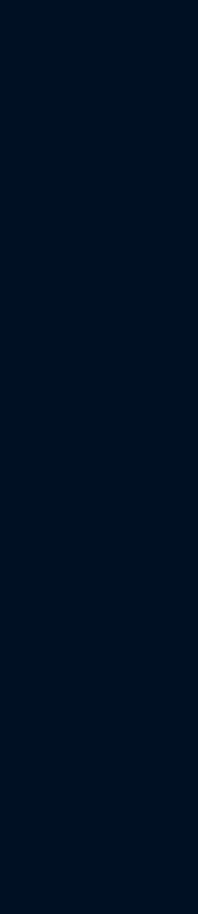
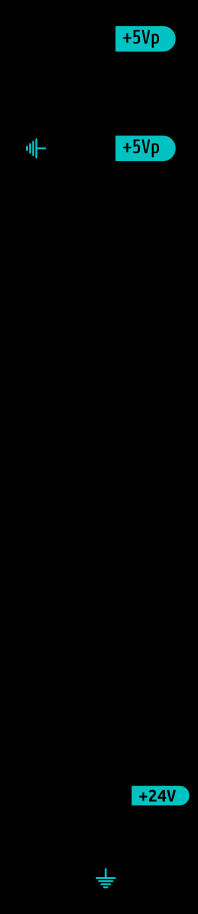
drawing: none -> [115, 26, 176, 52]
drawing: none -> [115, 135, 176, 162]
drawing: none -> [26, 138, 47, 159]
drawing: none -> [131, 785, 190, 806]
drawing: none -> [95, 868, 116, 889]

